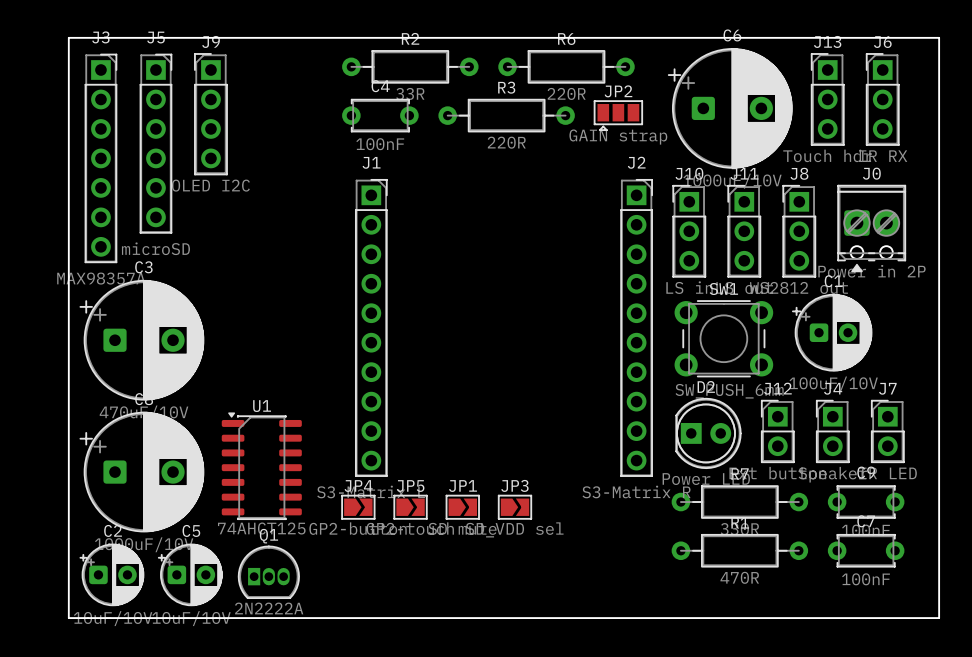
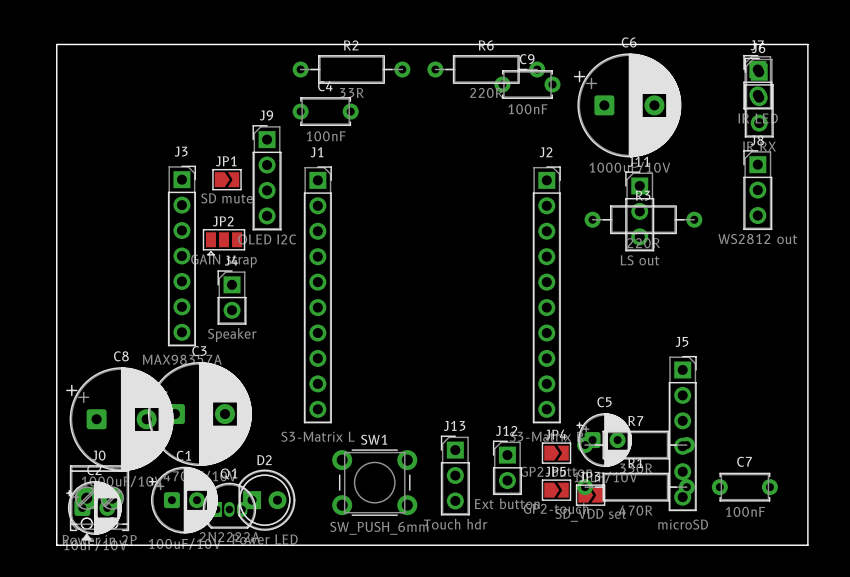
J13 position: (827, 99) -> (455, 475)
J9 position: (210, 114) -> (267, 177)
R3 position: (506, 115) -> (643, 219)
JP2 position: (618, 115) -> (224, 242)
J5 position: (155, 143) -> (682, 433)
J3 position: (100, 158) -> (181, 255)
J0 position: (871, 228) -> (99, 502)
J10: LS in (689, 231) -> none
J8 position: (799, 231) -> (757, 190)
C1 position: (832, 332) -> (183, 500)
SW1 position: (723, 338) -> (374, 482)
C3 position: (141, 340) -> (198, 414)
J12 position: (777, 431) -> (507, 467)
J4 position: (832, 431) -> (232, 297)
J7 position: (887, 431) -> (757, 82)
D2 position: (708, 433) -> (266, 500)
U1: 74AHCT125 (261, 466) -> none
C9 position: (866, 502) -> (527, 84)
JP4 position: (358, 507) -> (556, 453)
JP5 position: (410, 507) -> (556, 490)
JP1 position: (462, 507) -> (227, 179)
JP3 position: (514, 507) -> (590, 495)
C5 position: (190, 574) -> (604, 440)

